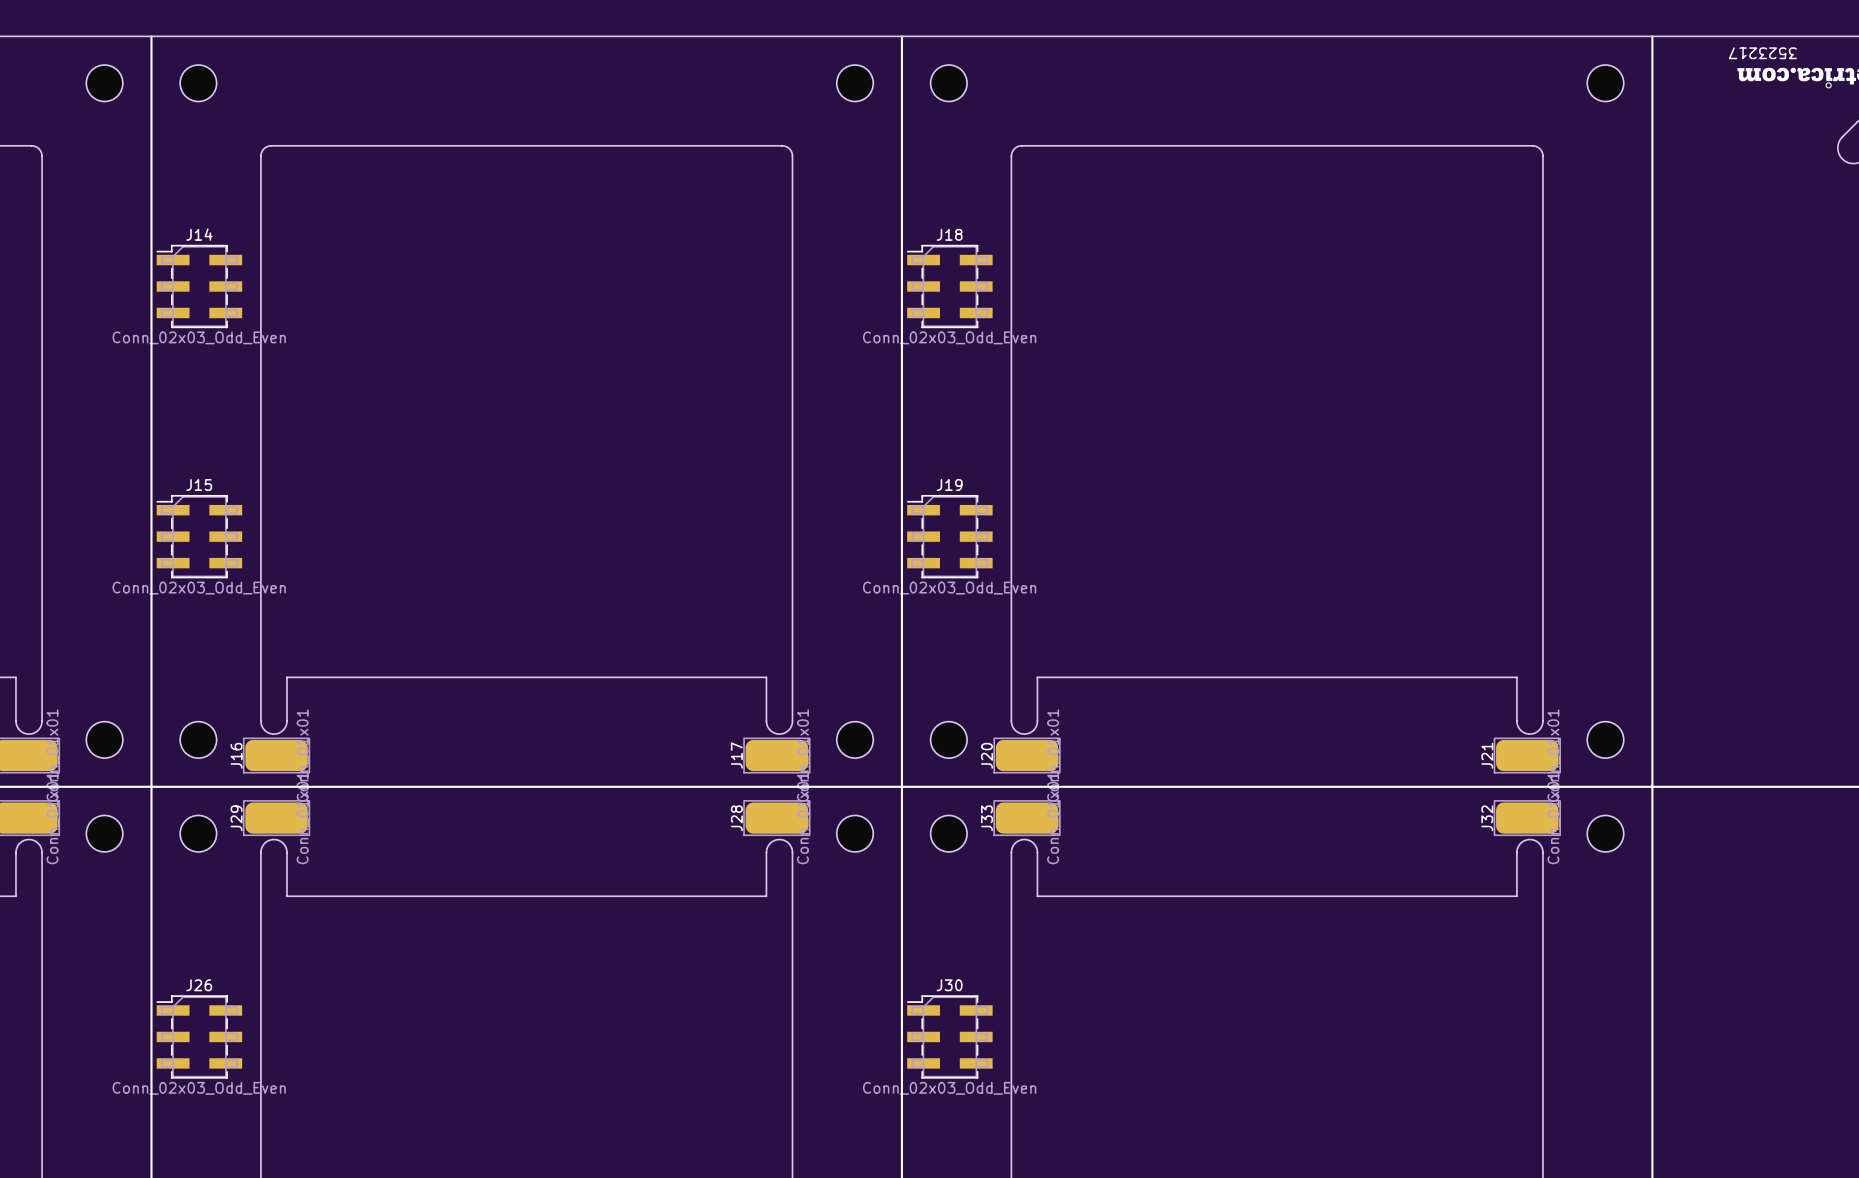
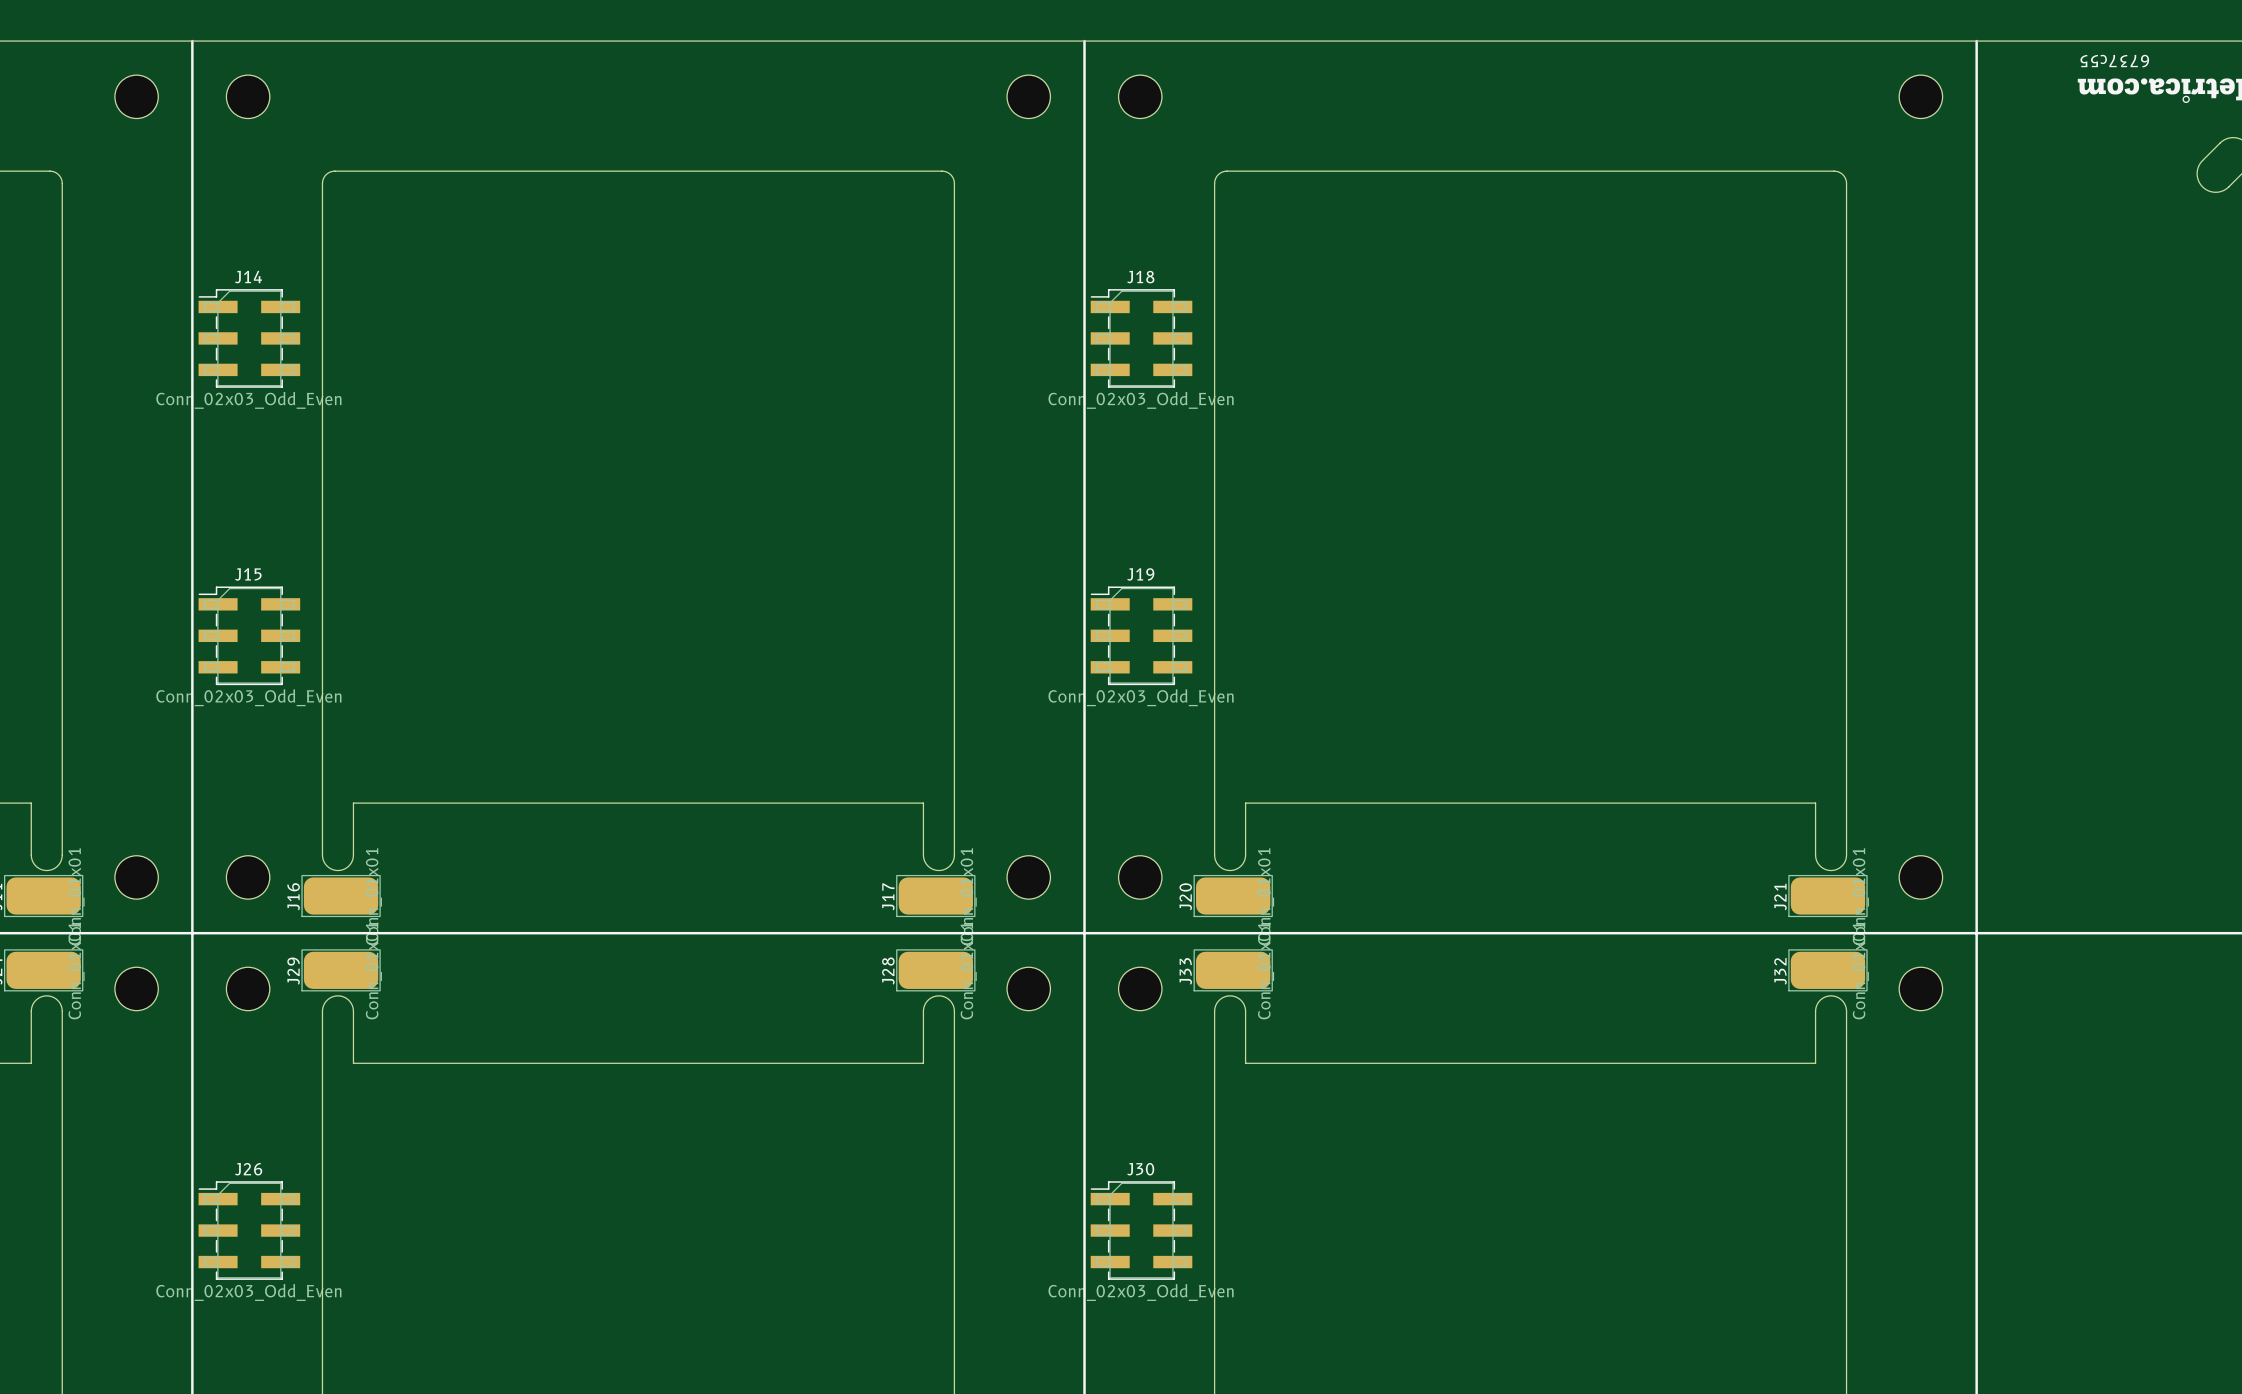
text: 3523217 (1762, 53) -> 6737c55 (2114, 61)

